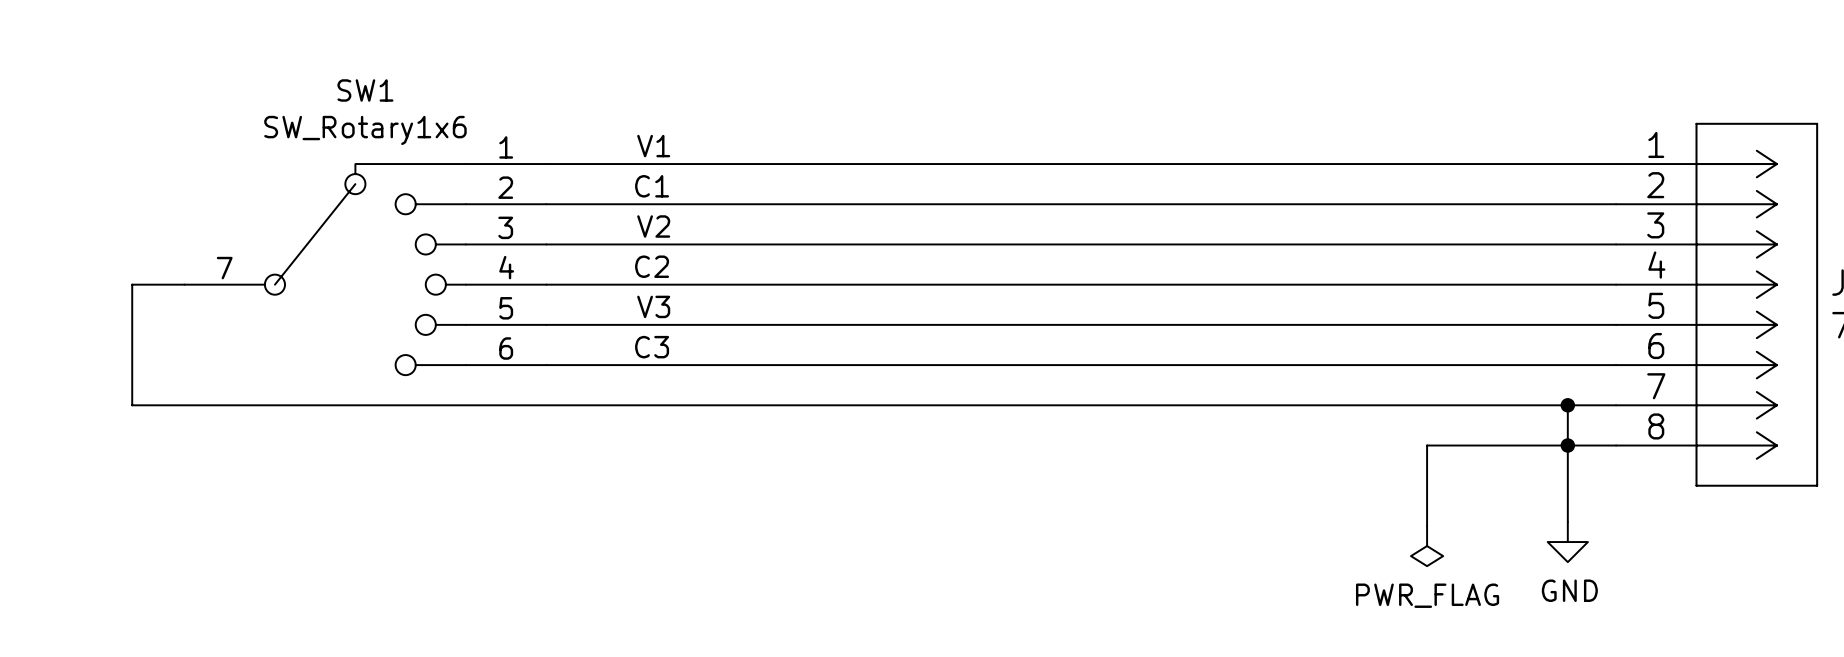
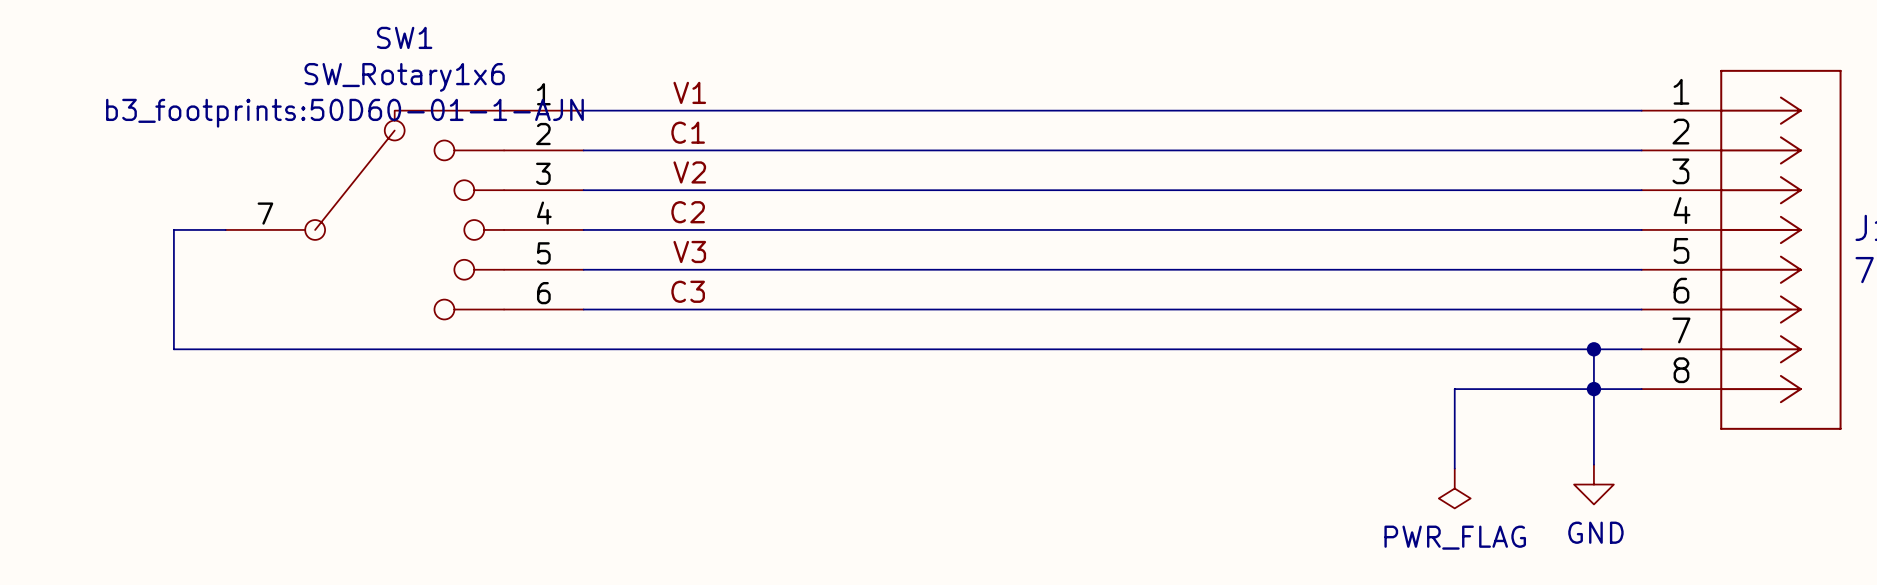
SW1 text: none -> b3_footprints:50D60-01-1-AJN (344, 113)

